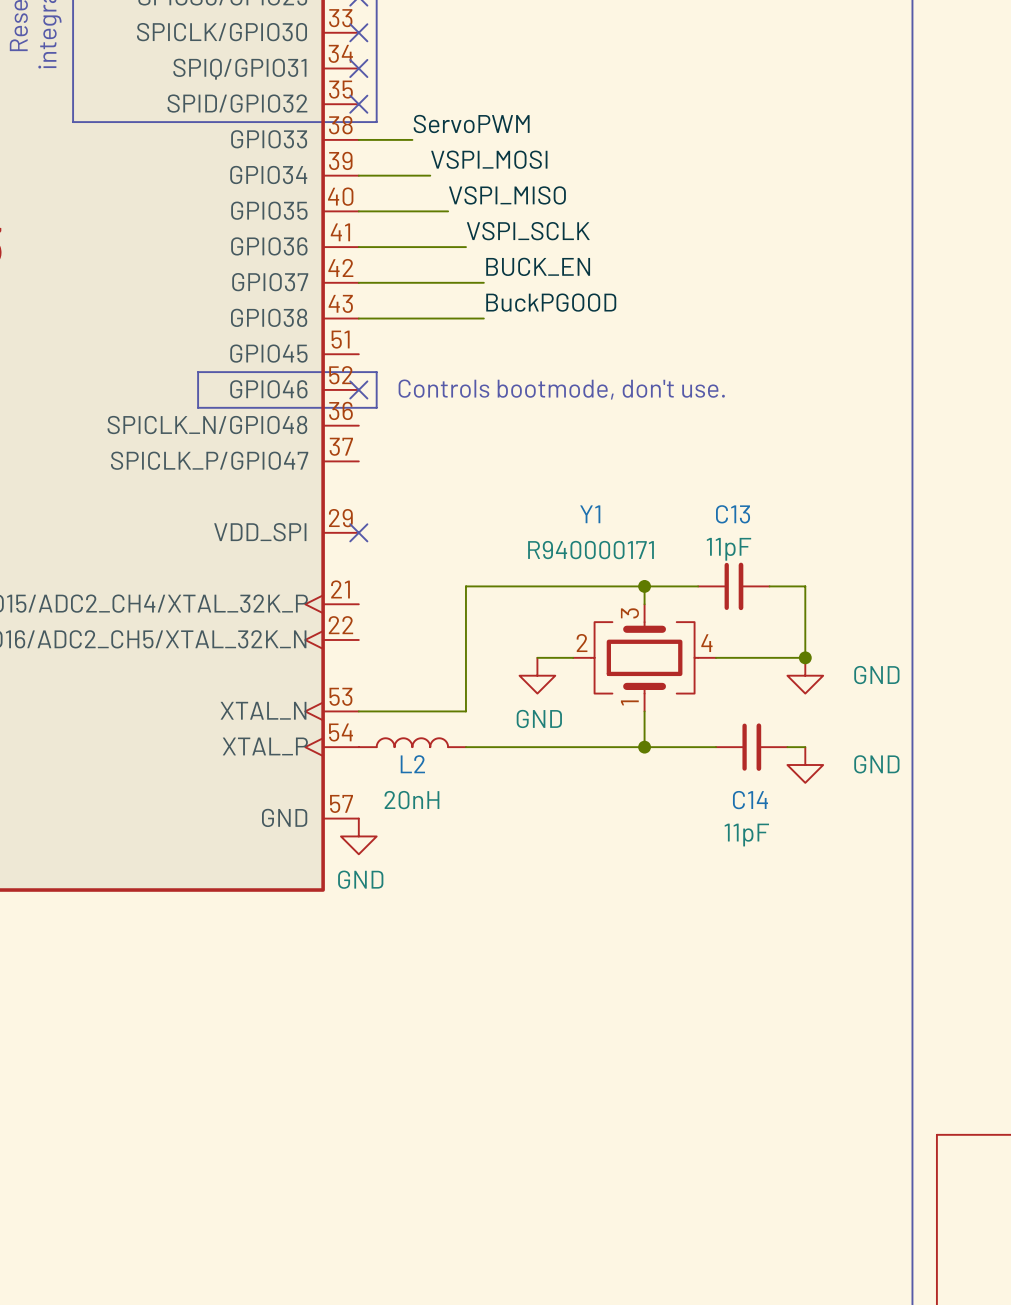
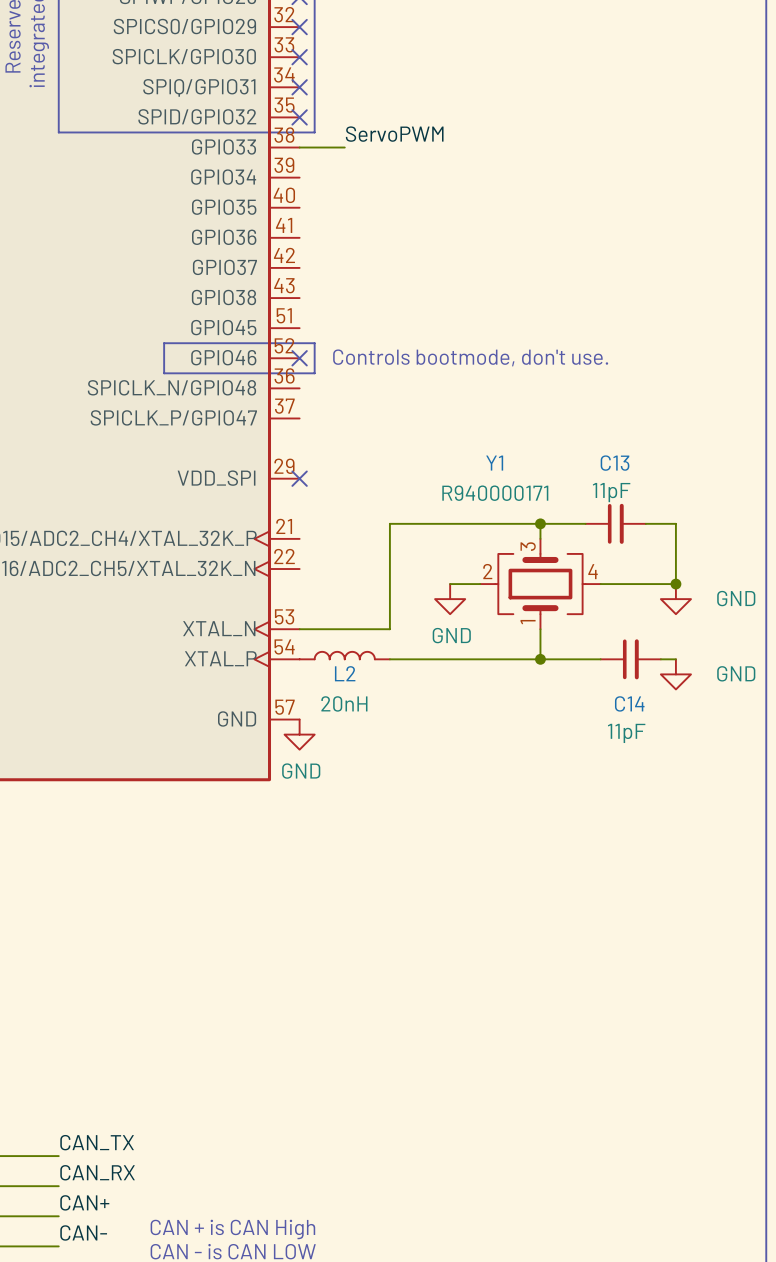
label: VSPI_MOSI (489, 159) -> none
wire: (358, 175) (430, 175) -> none
label: VSPI_MISO (507, 195) -> none
wire: (358, 211) (448, 211) -> none
label: VSPI_SCLK (528, 231) -> none
wire: (358, 247) (465, 247) -> none
label: BUCK_EN (538, 266) -> none
wire: (358, 282) (483, 282) -> none
label: BuckPGOOD (551, 302) -> none
wire: (358, 318) (483, 318) -> none

